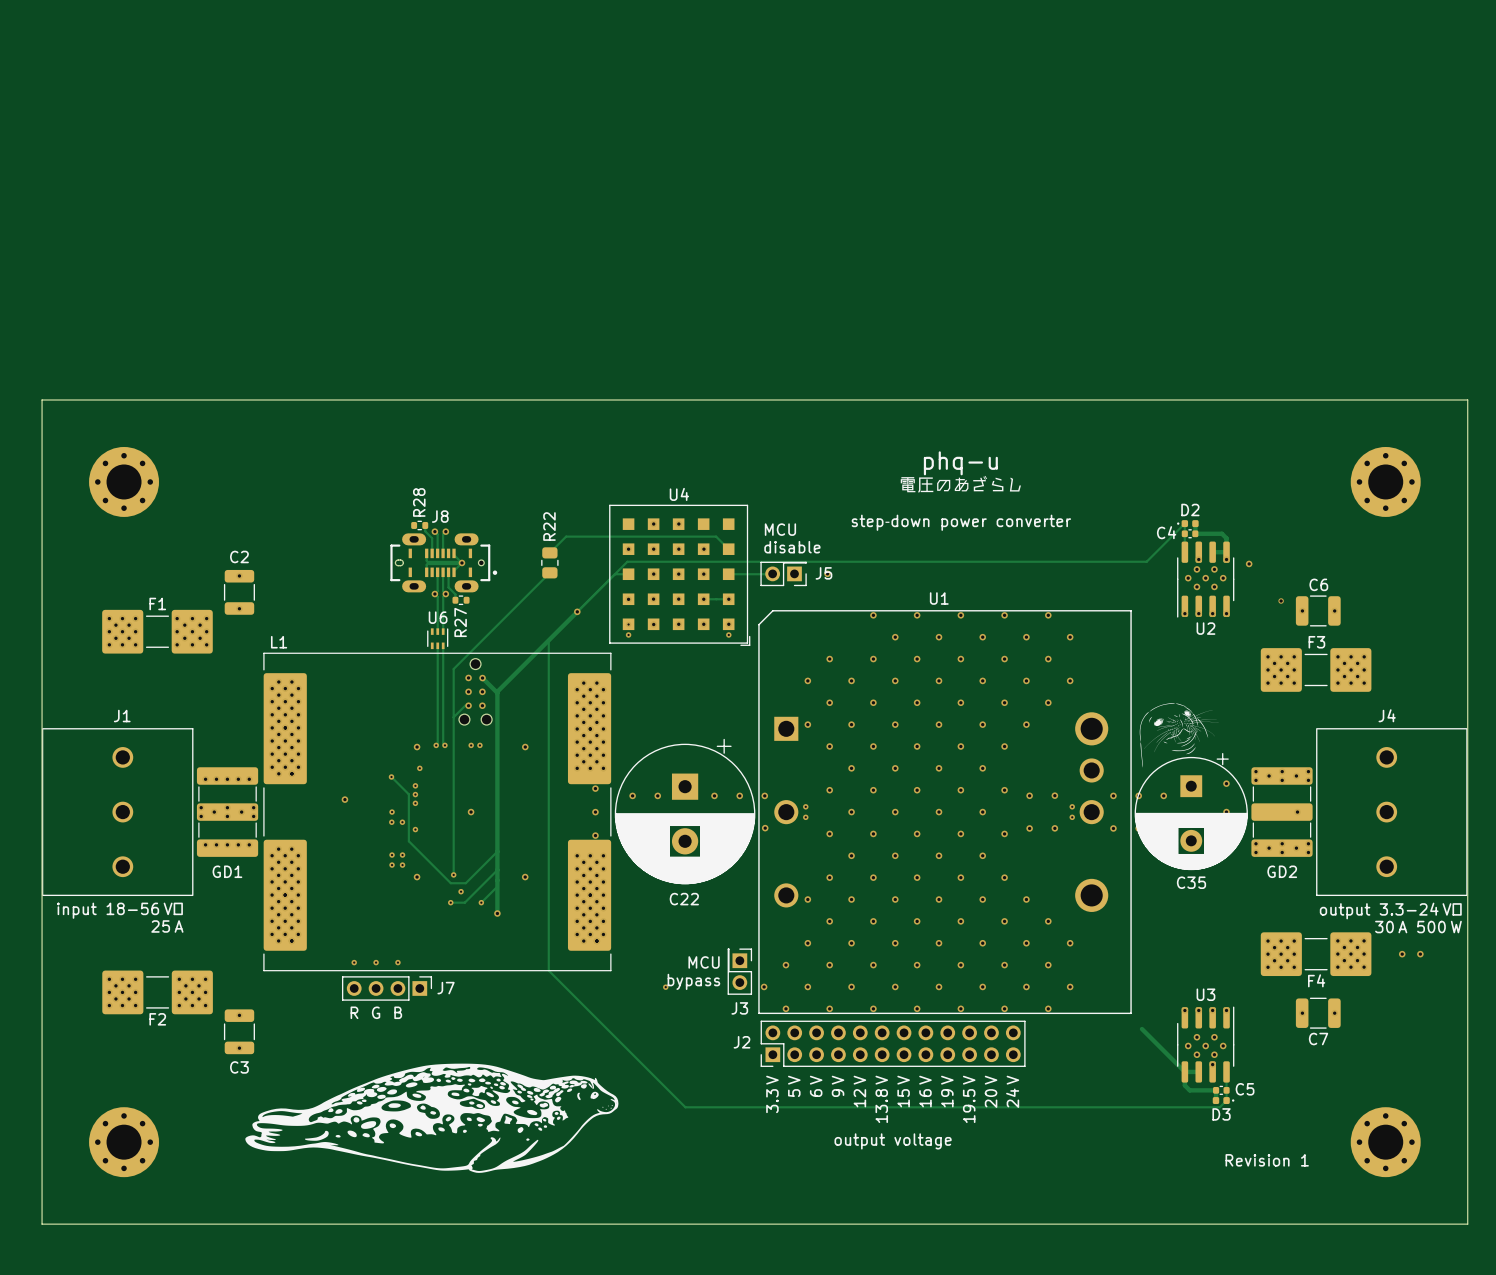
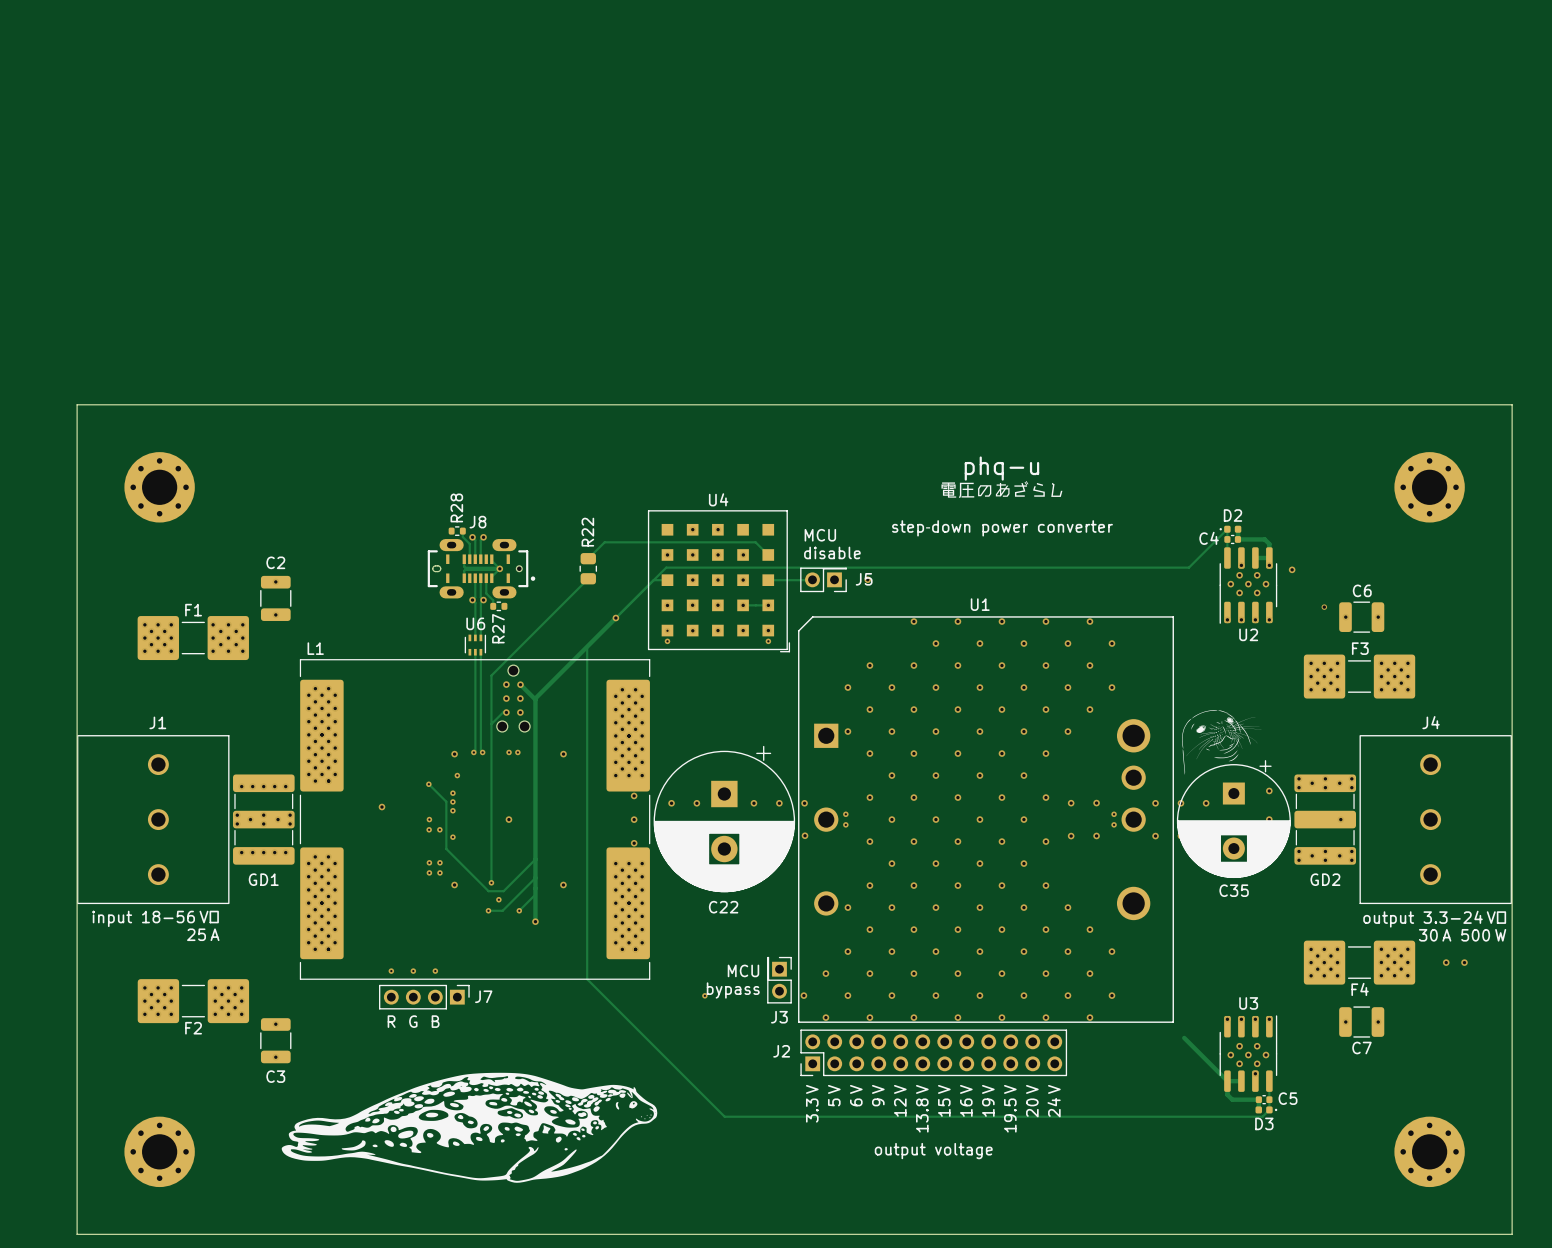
text: Revision 1 (1267, 1160) -> none

